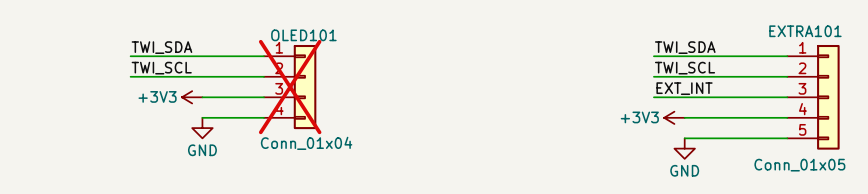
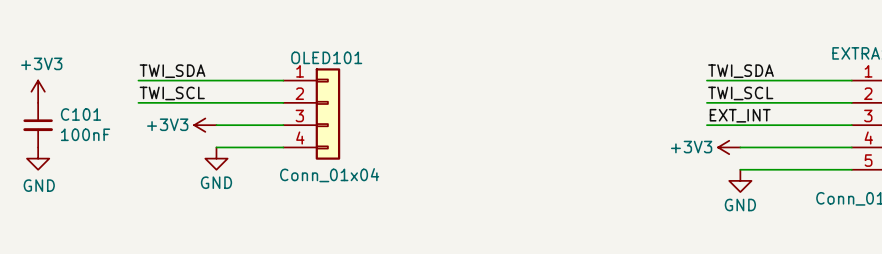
power symbol: none -> +3V3 (38, 91)
OLED101 do-not-place cross: (290, 87) -> none
C101: none -> 100nF (38, 125)
power symbol: none -> GND (38, 158)

